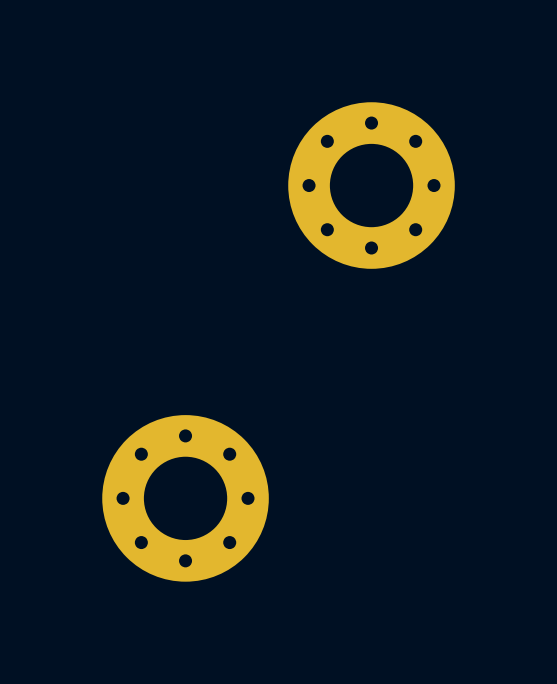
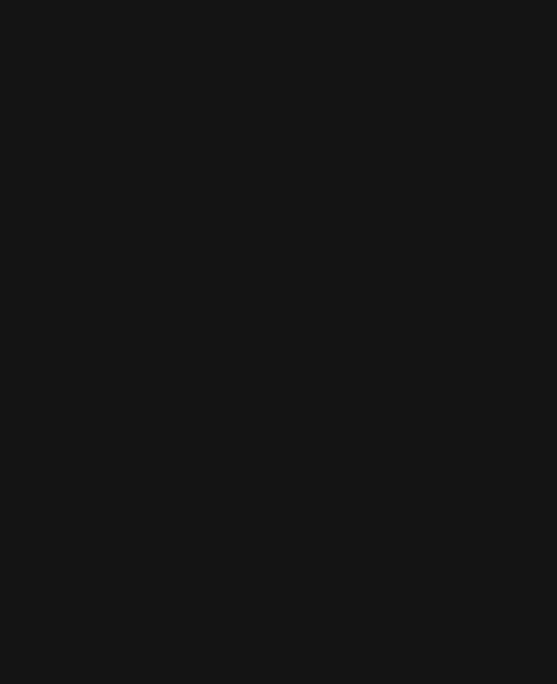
part: (371, 185) -> none
part: (185, 498) -> none

